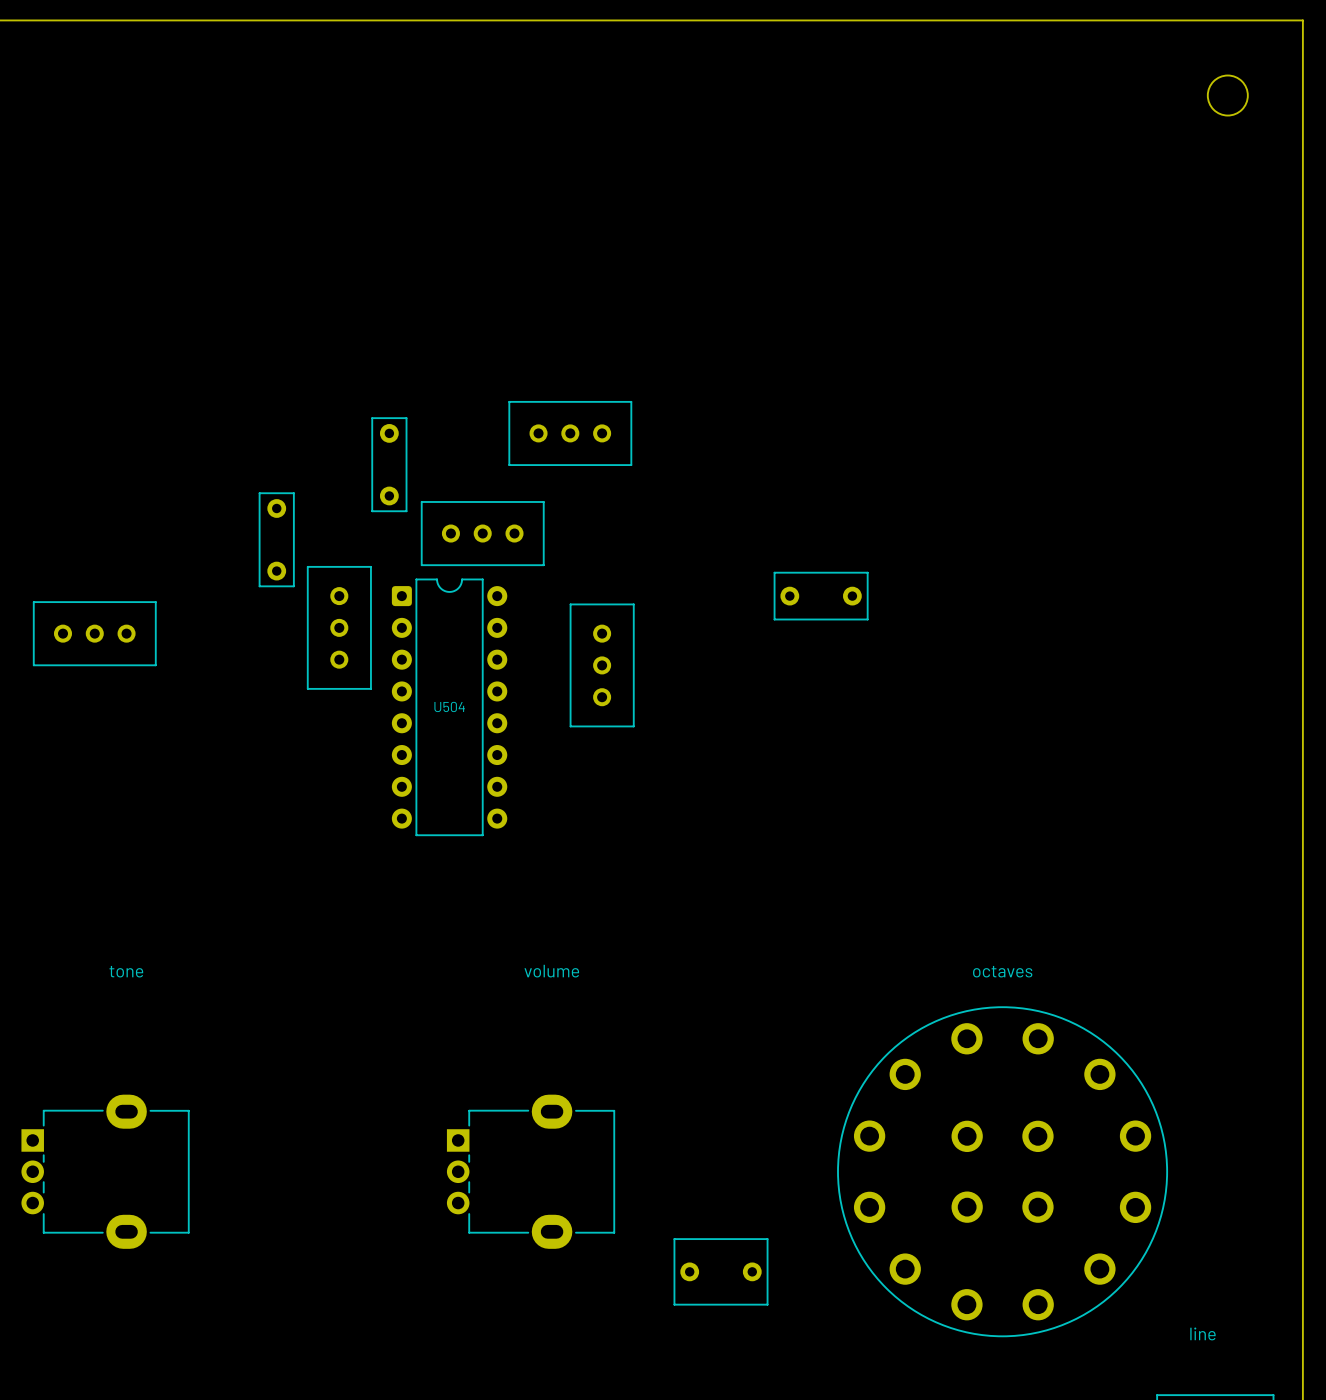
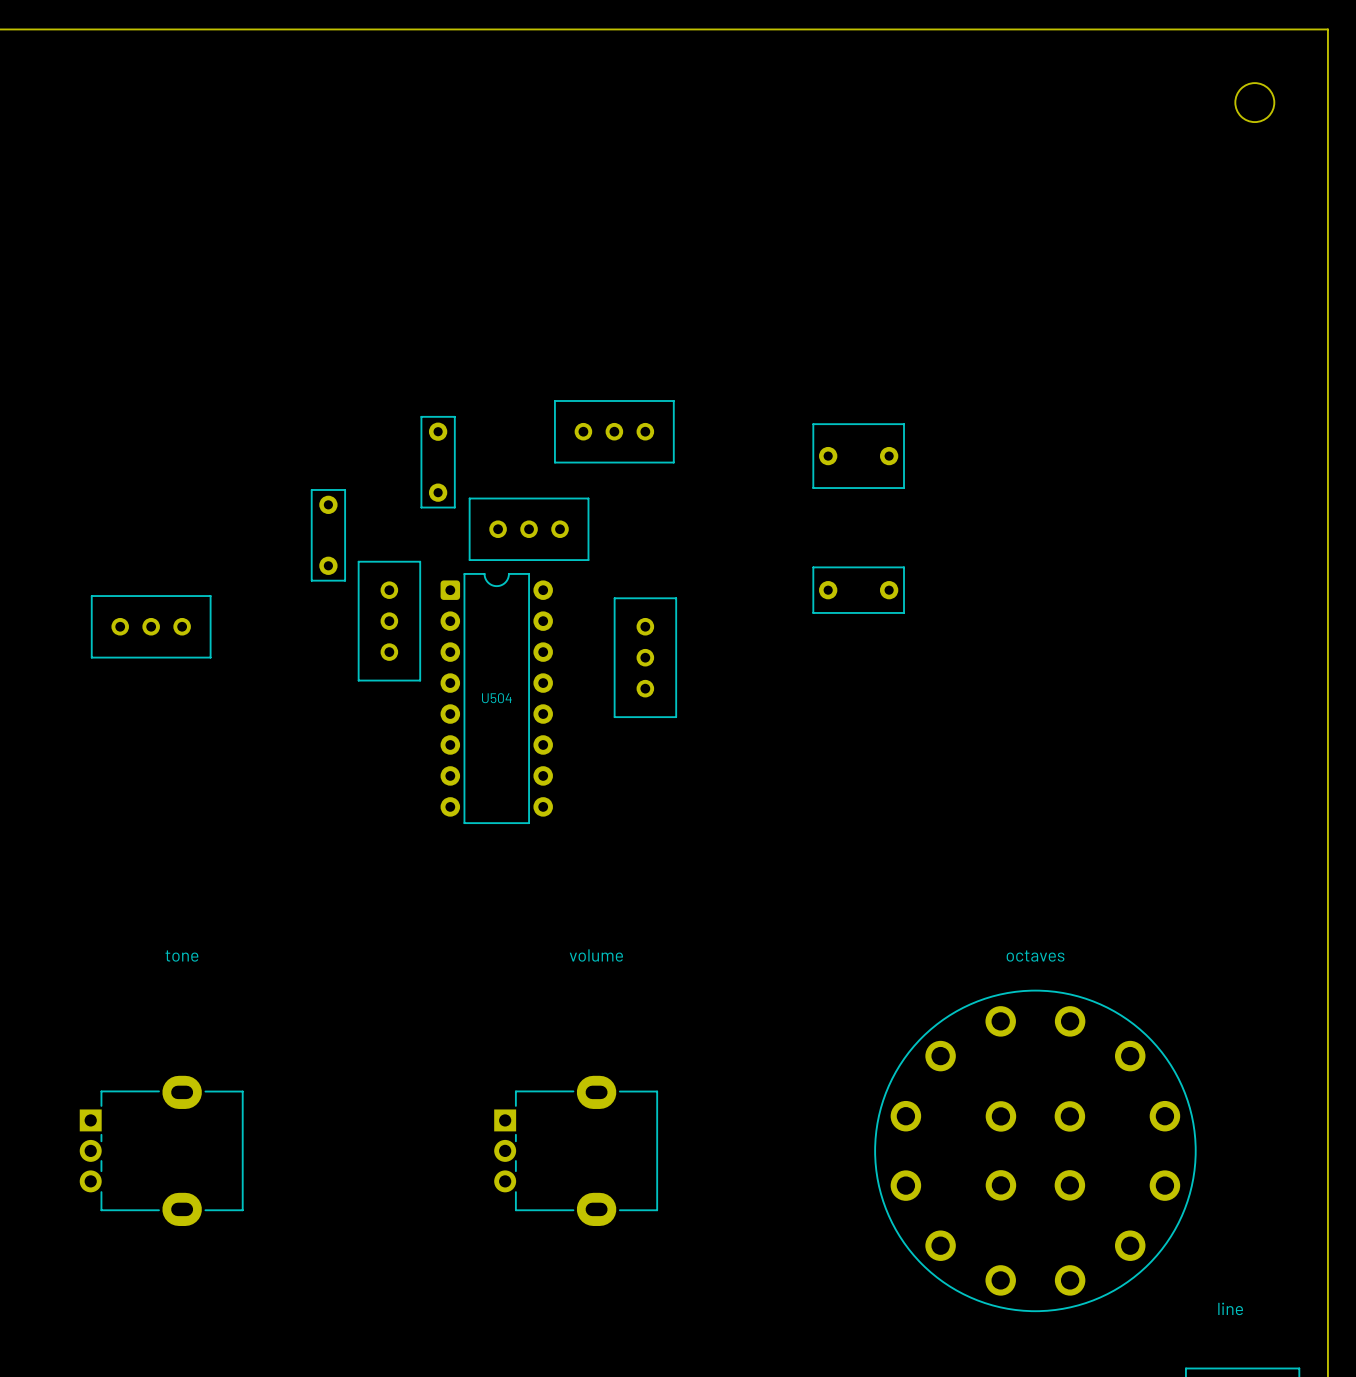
part: none -> (858, 456)
part: (720, 1271) -> none

